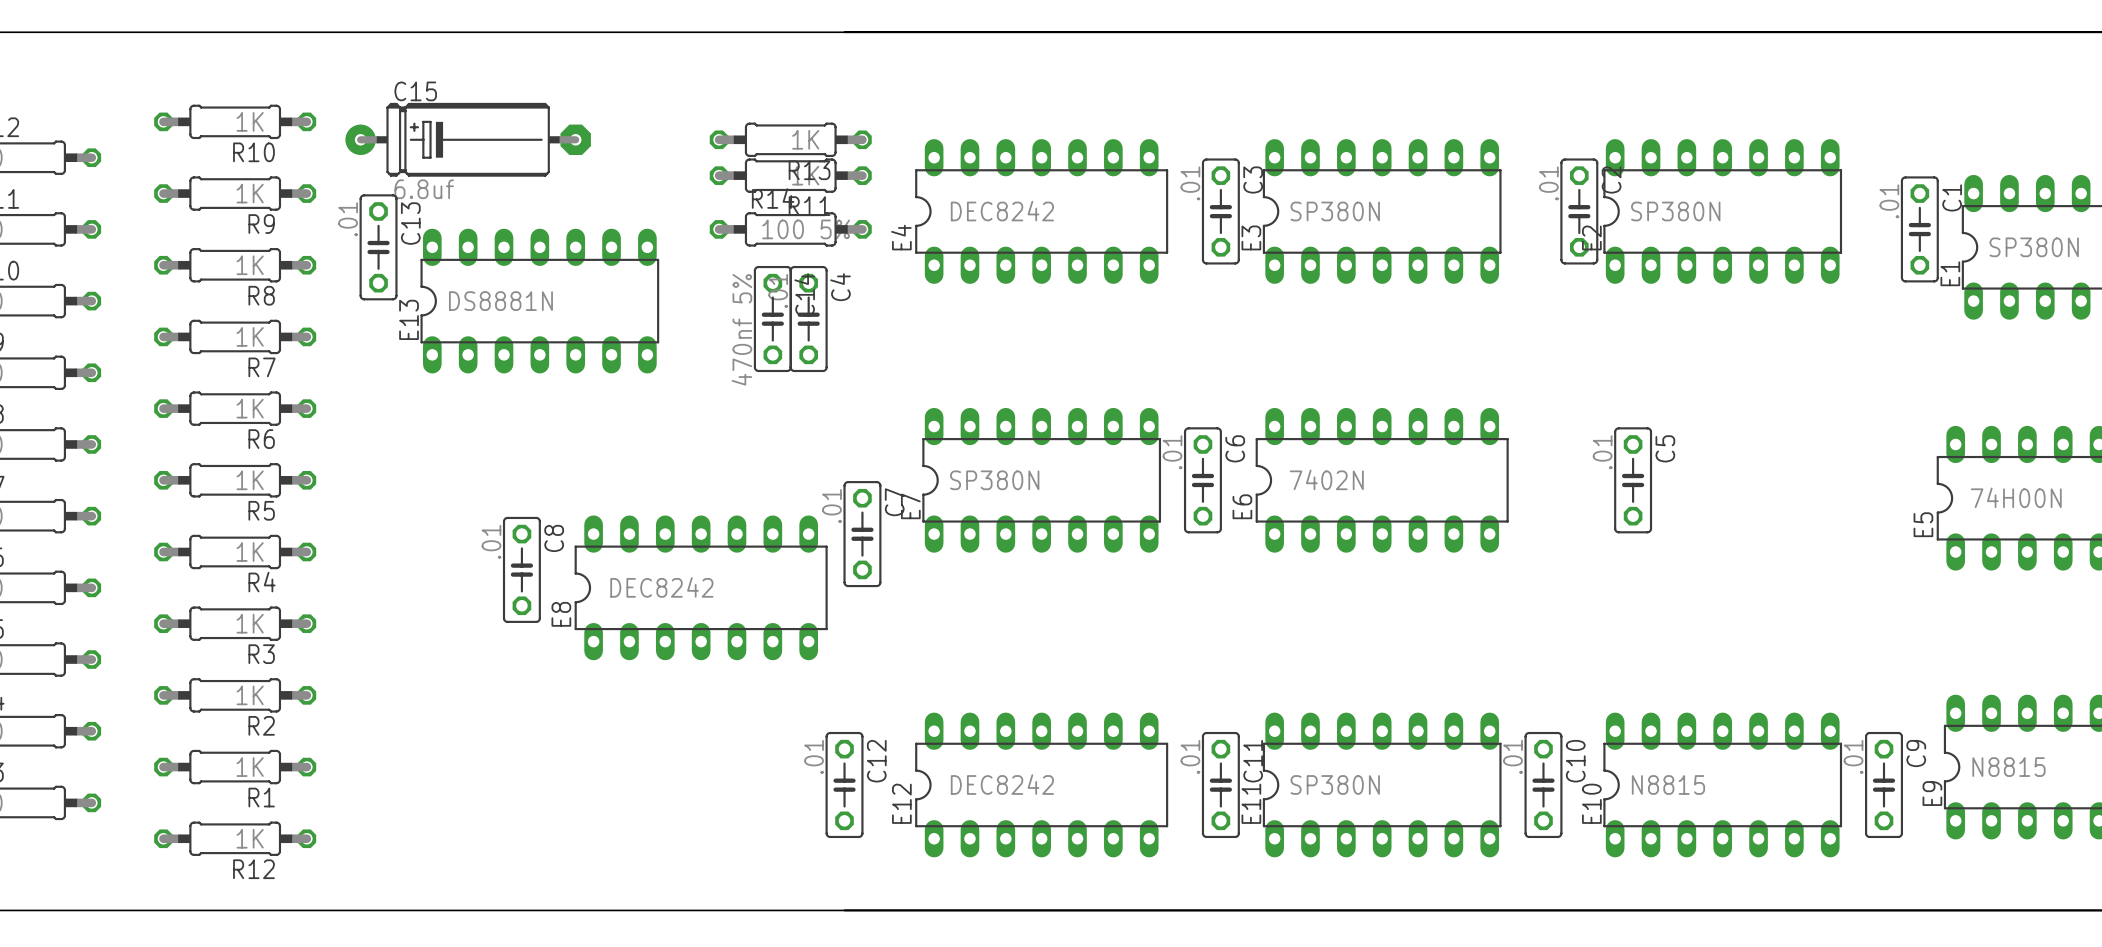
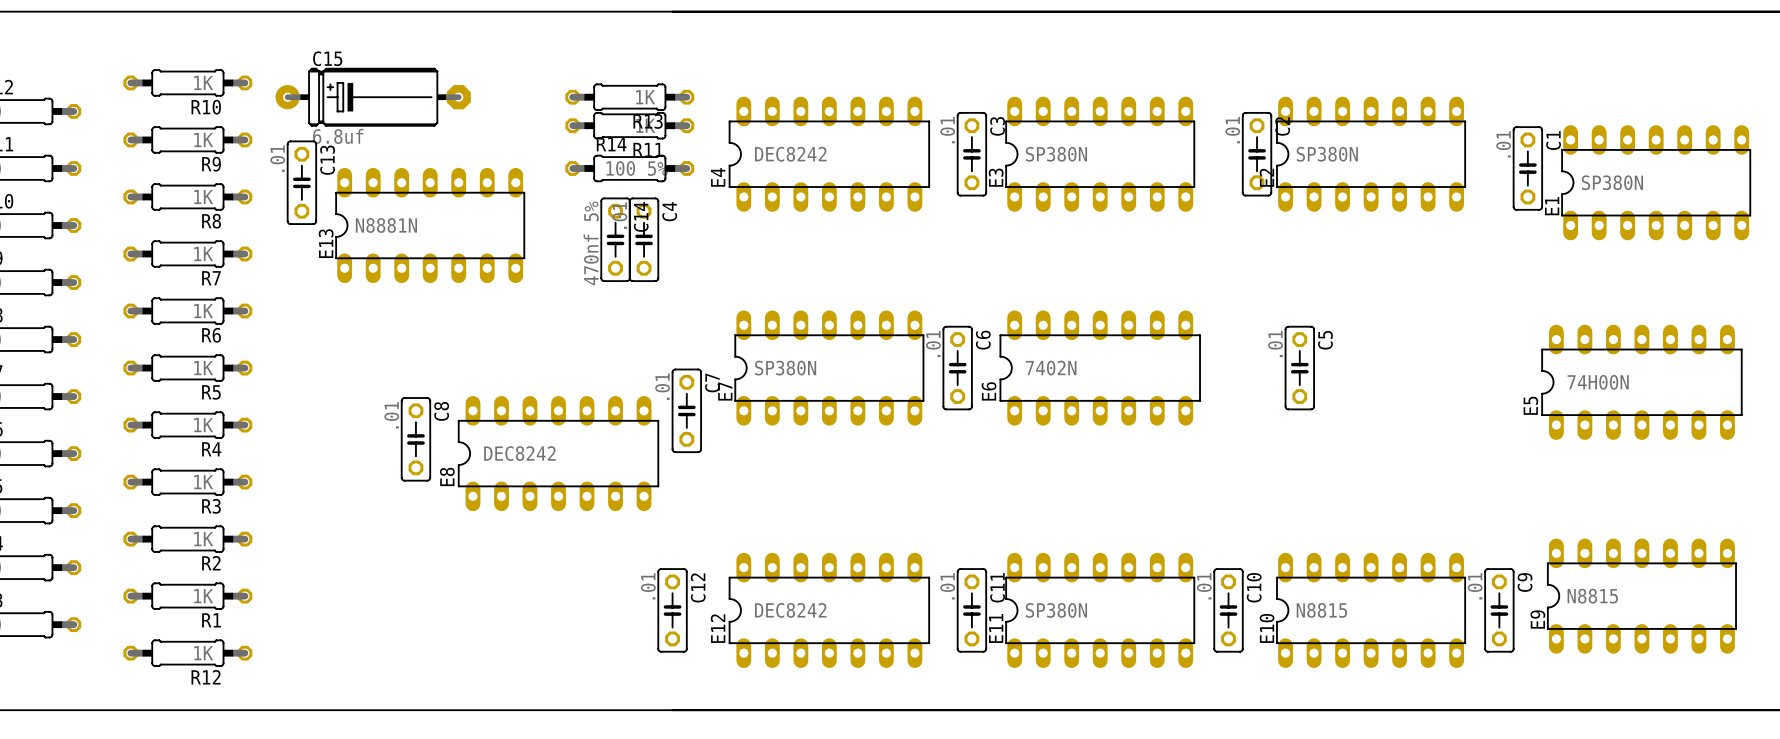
E13 value: DS8881N (500, 301) -> N8881N (386, 225)

